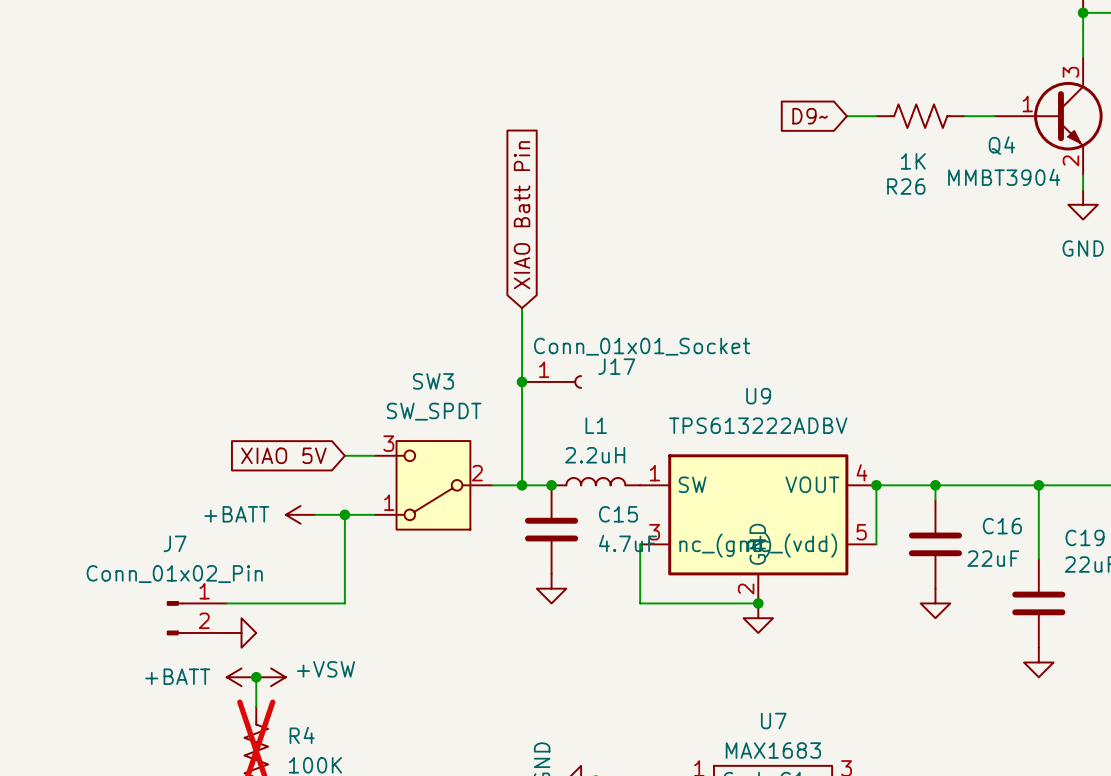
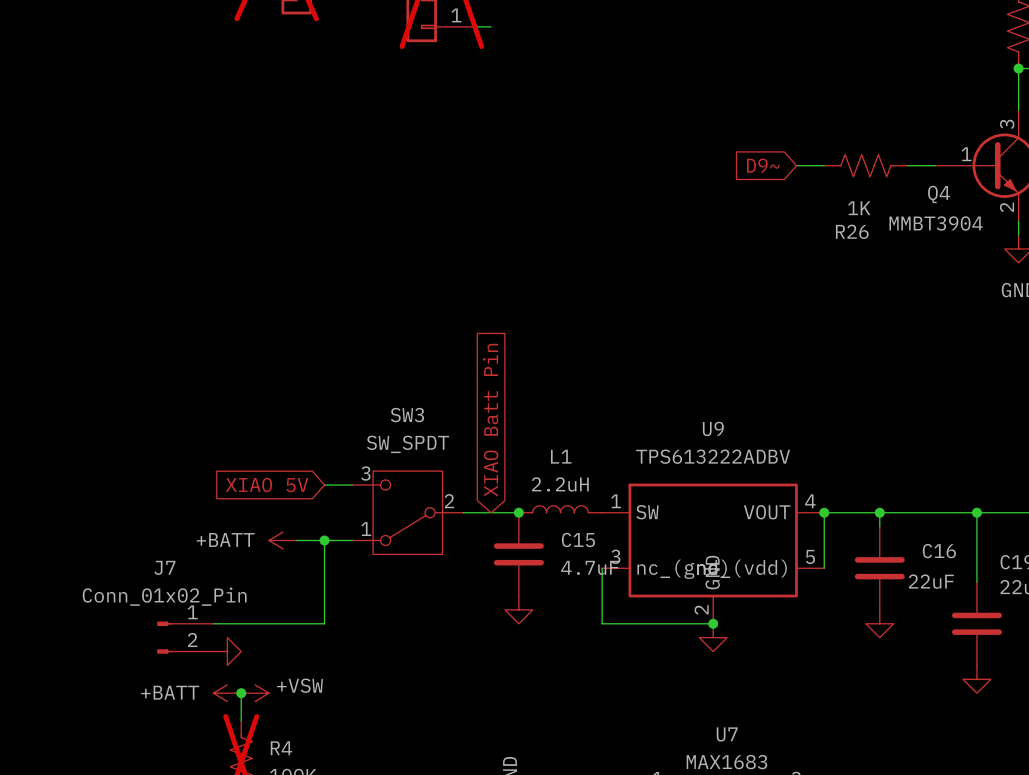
global label position: XIAO Batt Pin (522, 215) -> XIAO Batt Pin (490, 420)
wire: (522, 308) (522, 485) -> none
junction: (522, 381) -> none
J17: Conn_01x01_Socket (552, 381) -> none
junction: (522, 485) -> none

